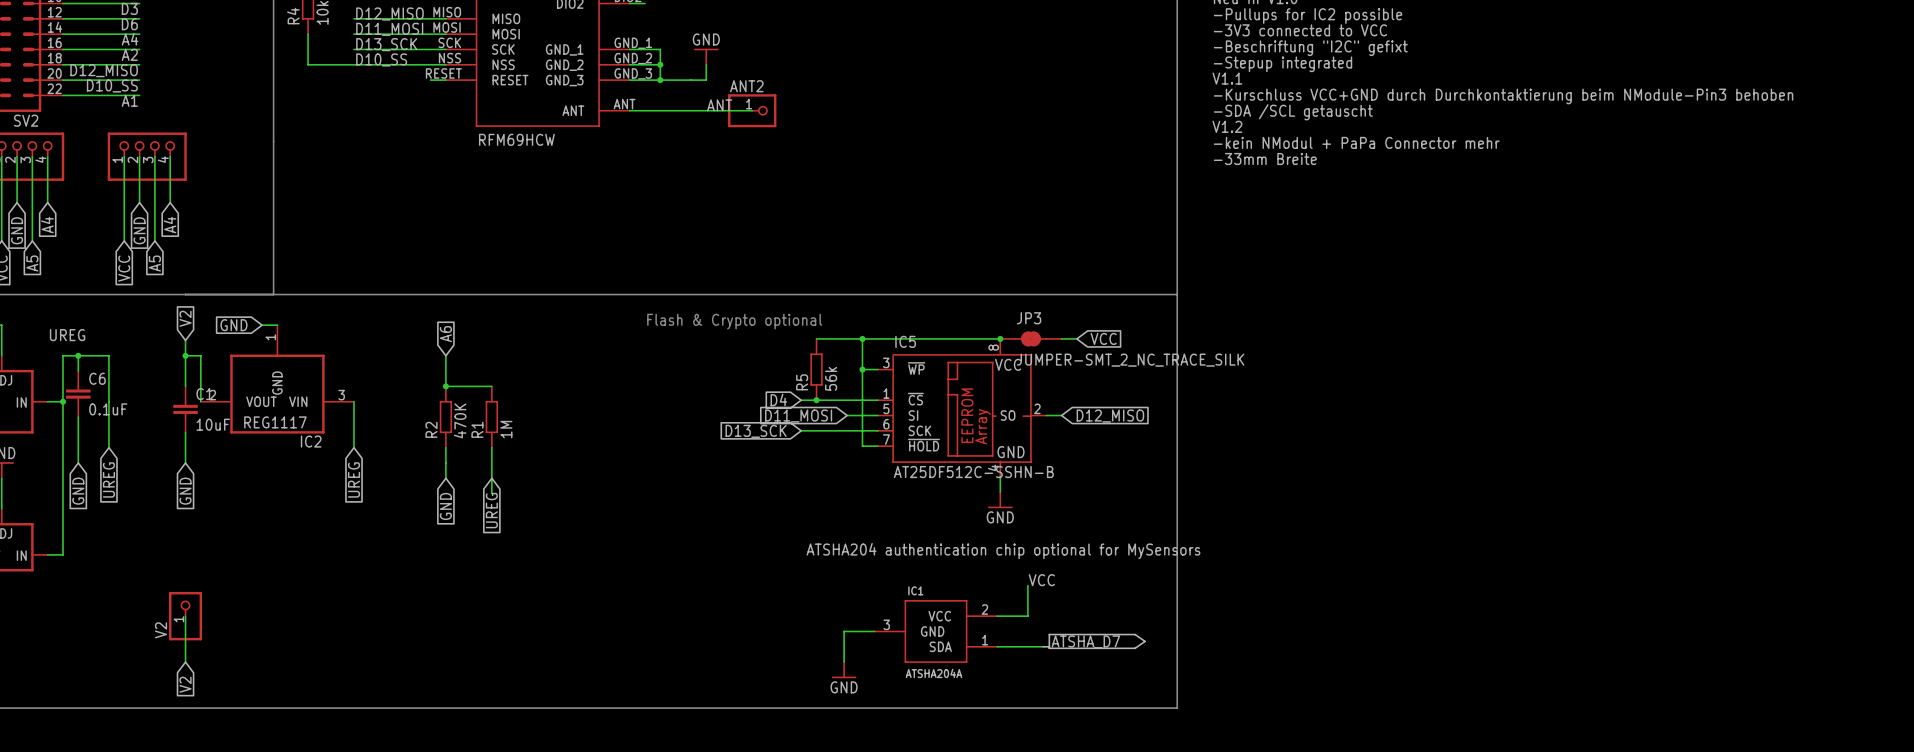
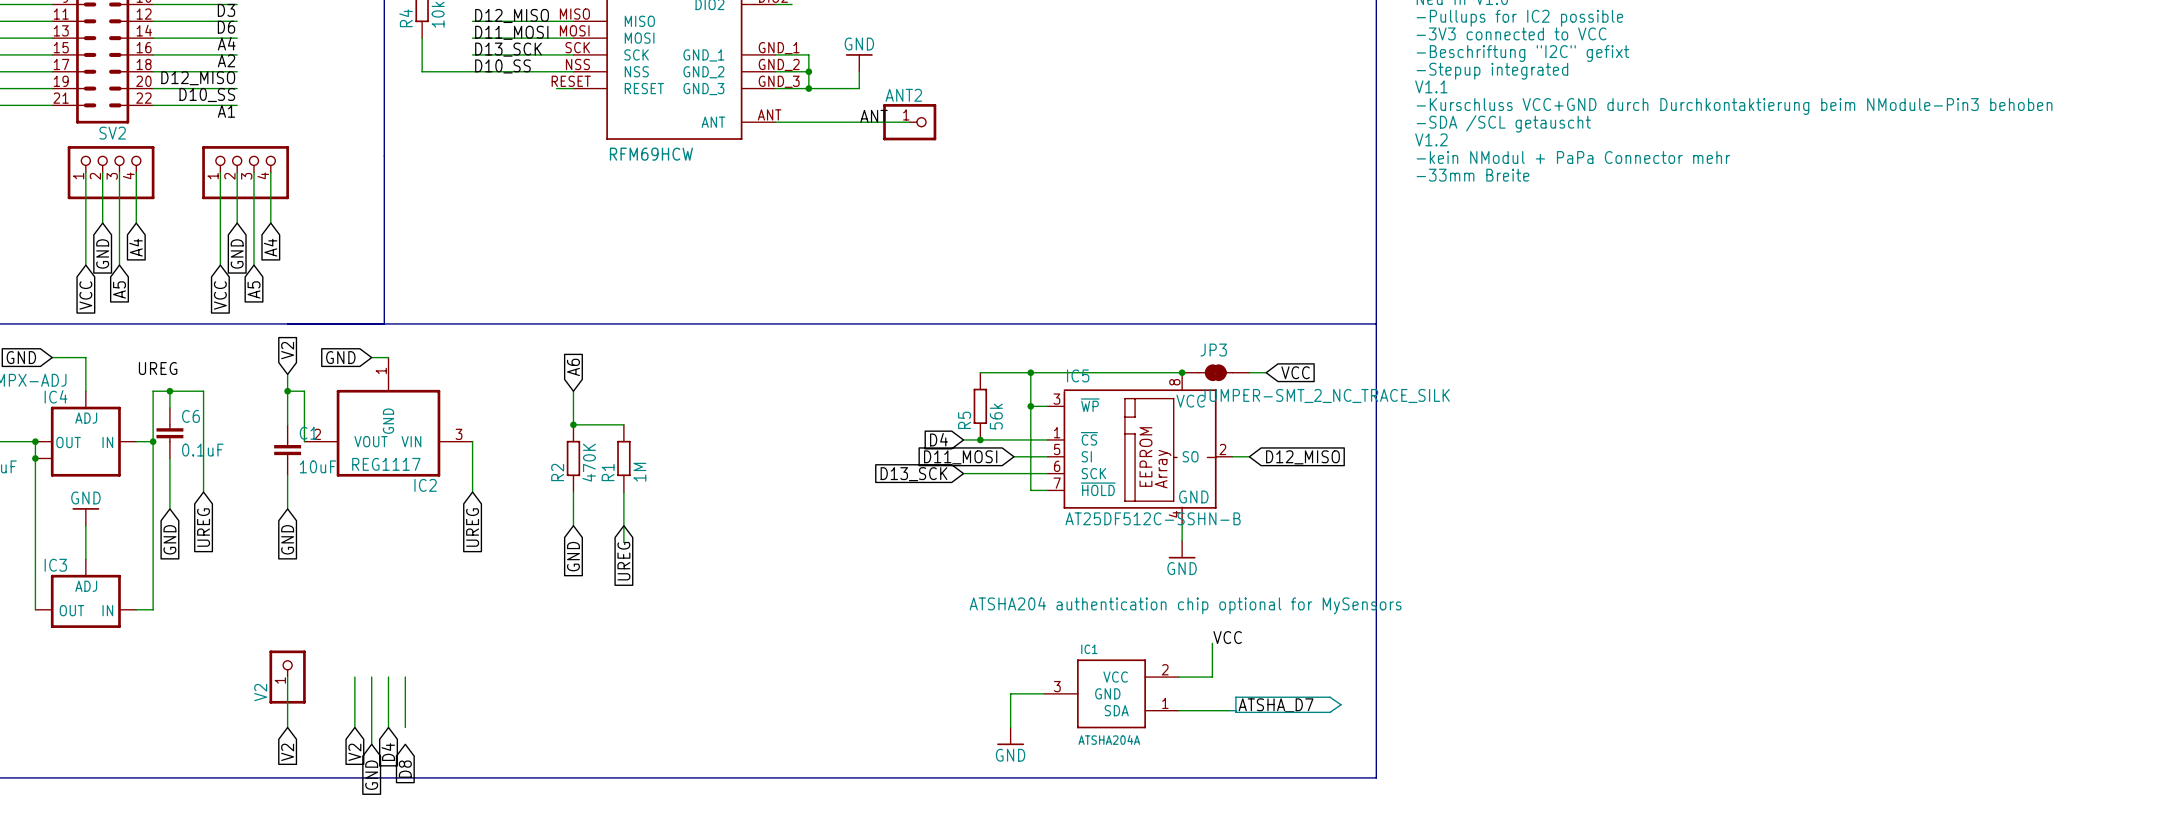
text: Flash & Crypto optional (734, 321) -> none
wire: none -> (354, 677) (354, 727)
wire: none -> (371, 677) (371, 744)
wire: none -> (388, 677) (388, 727)
wire: none -> (405, 677) (405, 727)
global label: none -> V2 (354, 752)
global label: none -> D4 (388, 752)
global label: none -> D8 (405, 769)
global label: none -> GND (371, 775)

